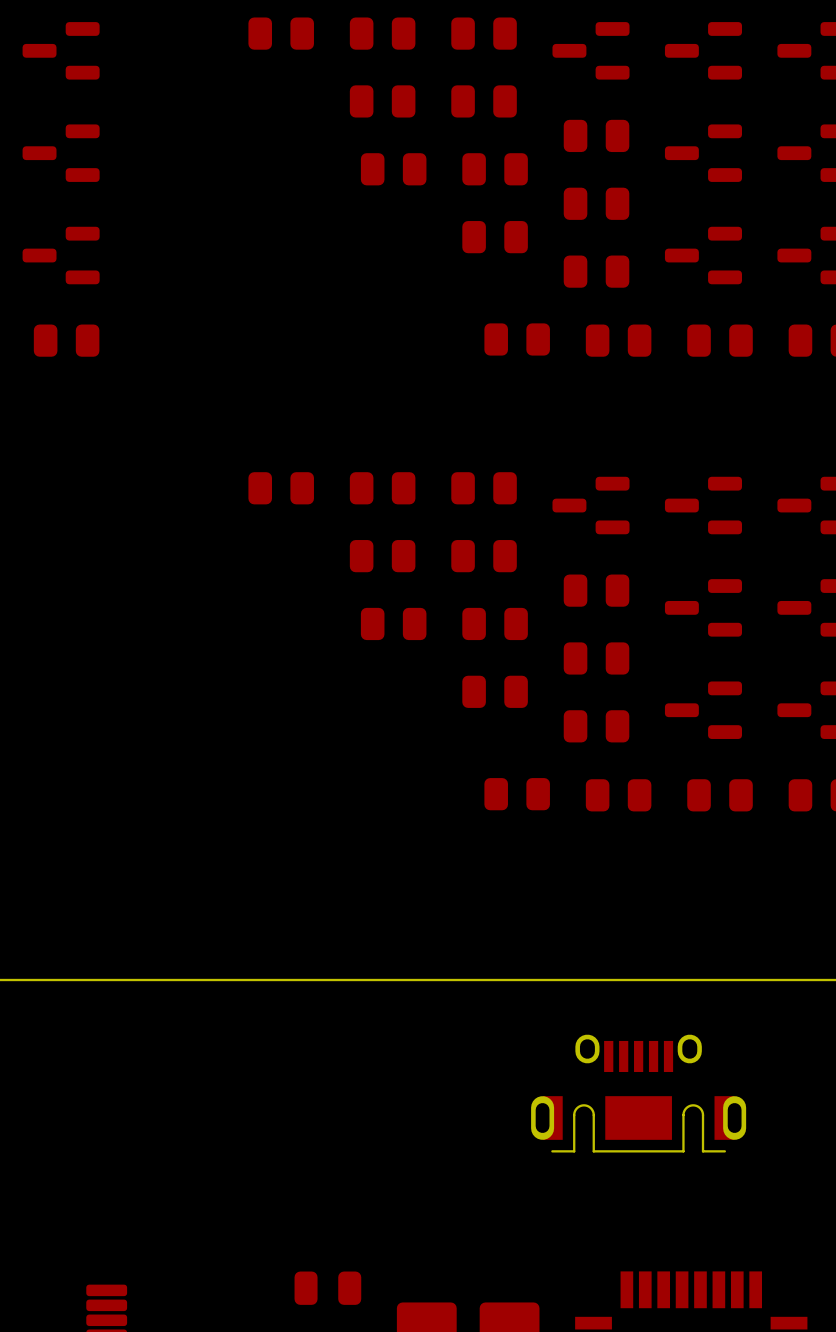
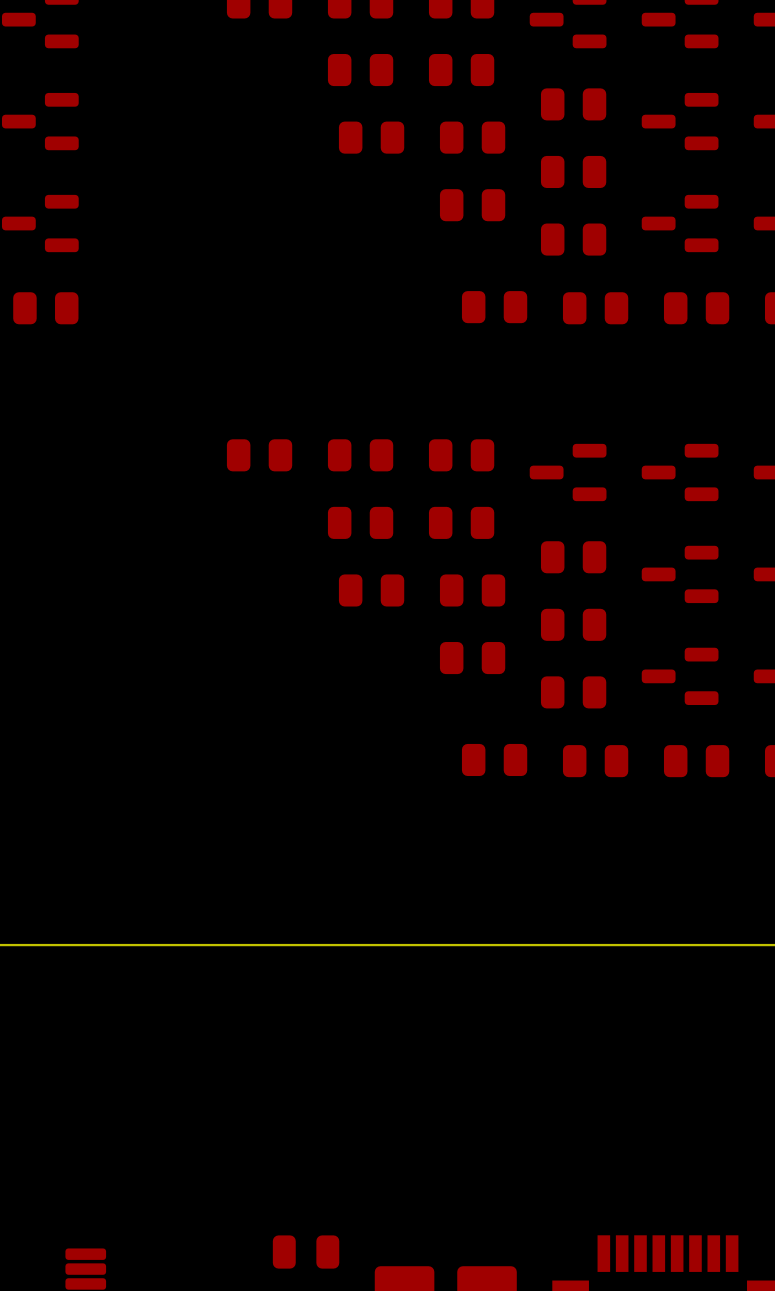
part: (638, 1093) -> none

